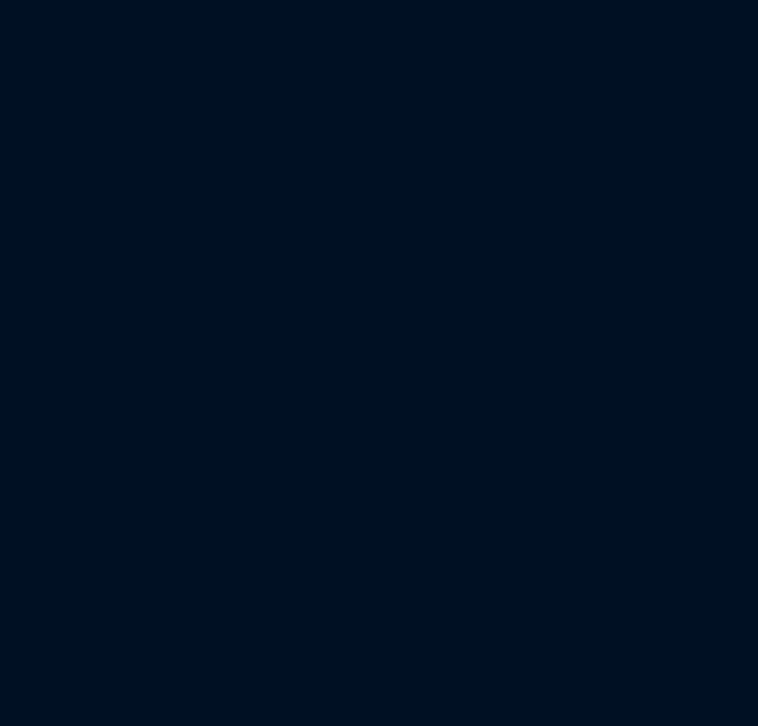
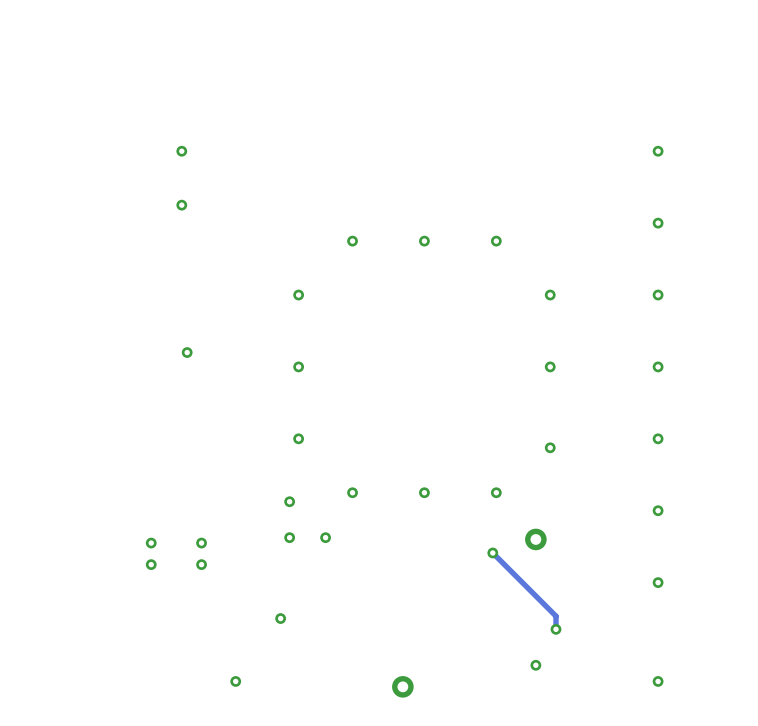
via: none -> (181, 151)
via: none -> (658, 151)
via: none -> (181, 205)
via: none -> (658, 223)
via: none -> (352, 241)
via: none -> (424, 241)
via: none -> (496, 241)
via: none -> (298, 295)
via: none -> (550, 295)
via: none -> (658, 295)
via: none -> (187, 352)
via: none -> (298, 366)
via: none -> (550, 366)
via: none -> (658, 366)
via: none -> (298, 438)
via: none -> (658, 438)
via: none -> (550, 447)
via: none -> (352, 492)
via: none -> (424, 492)
via: none -> (496, 492)
via: none -> (289, 501)
via: none -> (658, 510)
via: none -> (289, 537)
via: none -> (325, 537)
via: none -> (535, 539)
via: none -> (151, 543)
via: none -> (201, 543)
track: none -> (492, 552) (556, 616) (556, 629)
via: none -> (492, 552)
via: none -> (151, 564)
via: none -> (201, 564)
via: none -> (658, 582)
via: none -> (280, 618)
via: none -> (556, 629)
via: none -> (535, 665)
via: none -> (235, 681)
via: none -> (658, 681)
via: none -> (402, 686)

